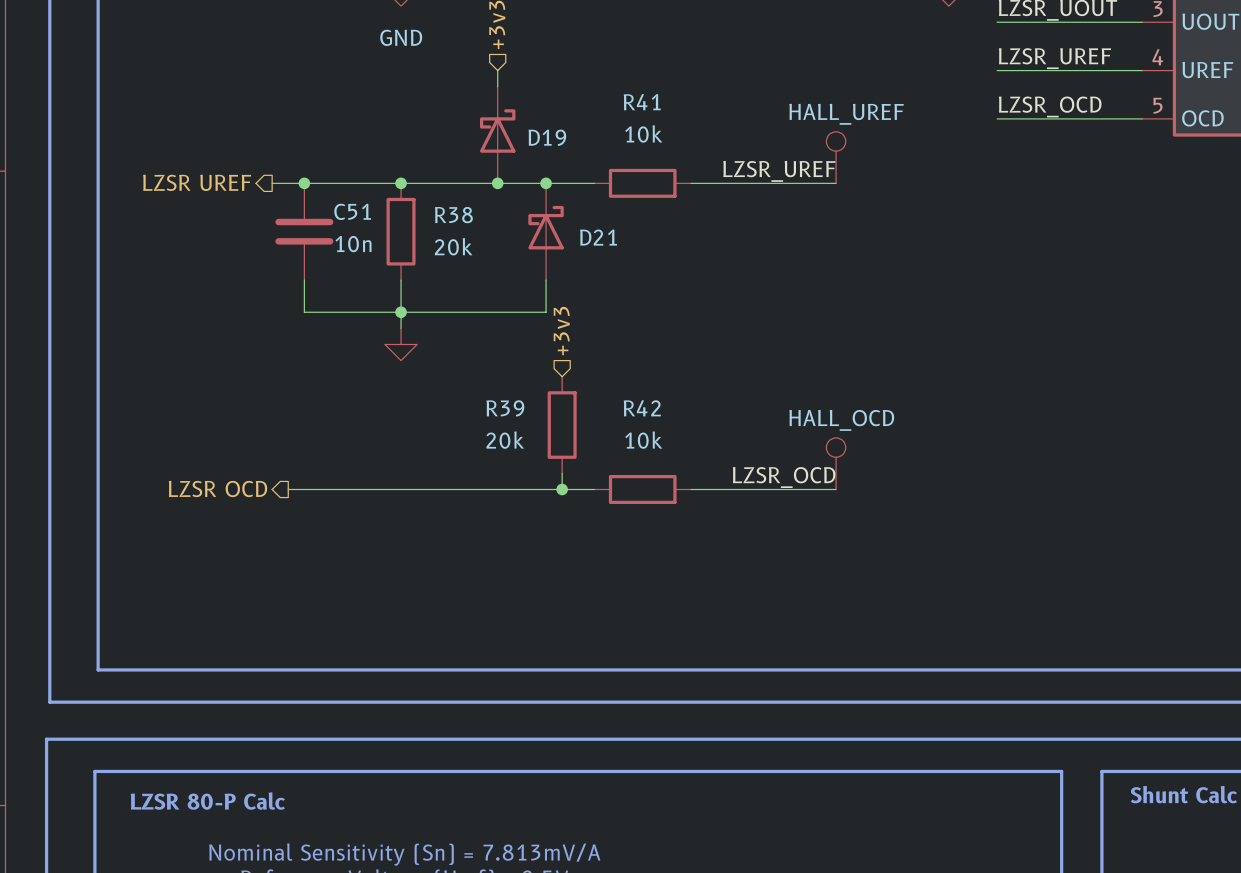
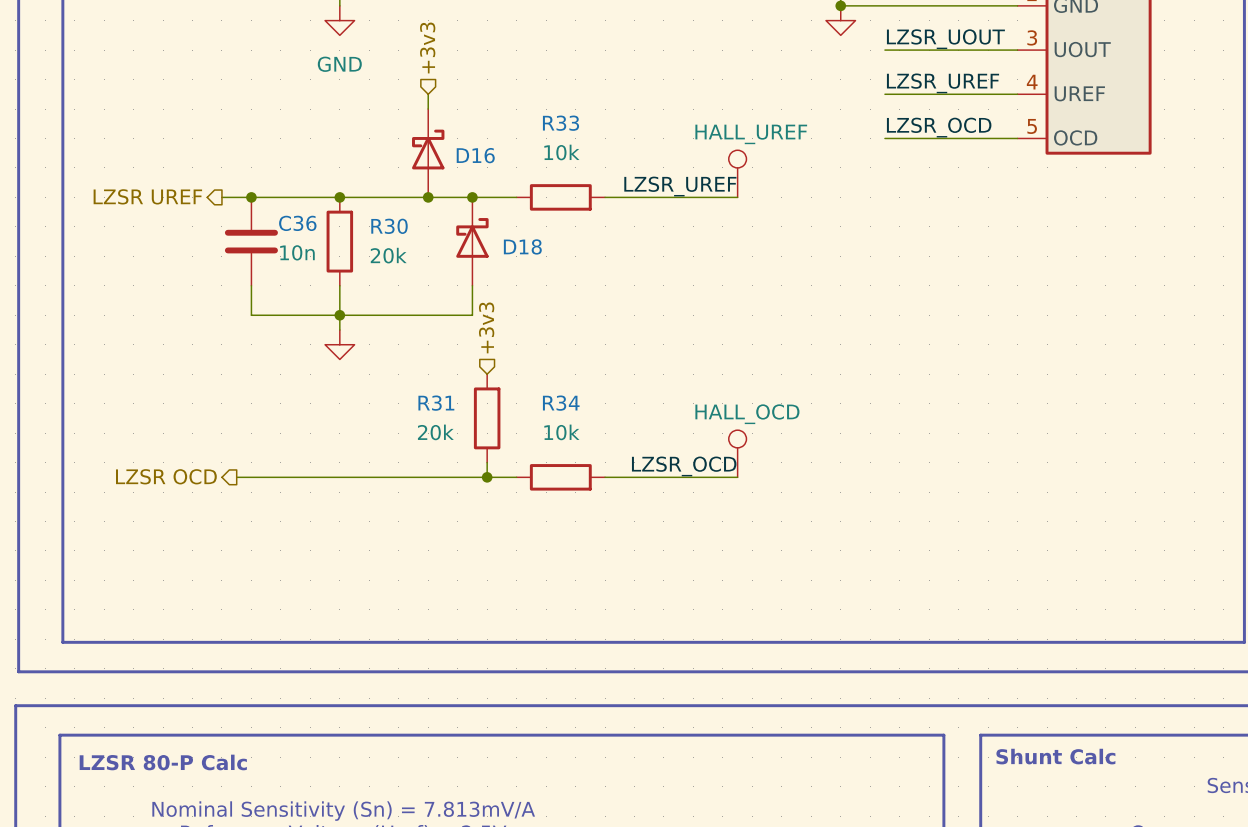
R41 name: R41 (642, 102) -> R33 (561, 123)
D19 name: D19 (547, 137) -> D16 (475, 155)
C51 name: C51 (352, 211) -> C36 (297, 223)
R38 name: R38 (453, 215) -> R30 (389, 226)
D21 name: D21 (598, 237) -> D18 (522, 246)
R39 name: R39 (505, 408) -> R31 (436, 403)
R42 name: R42 (642, 408) -> R34 (561, 403)

